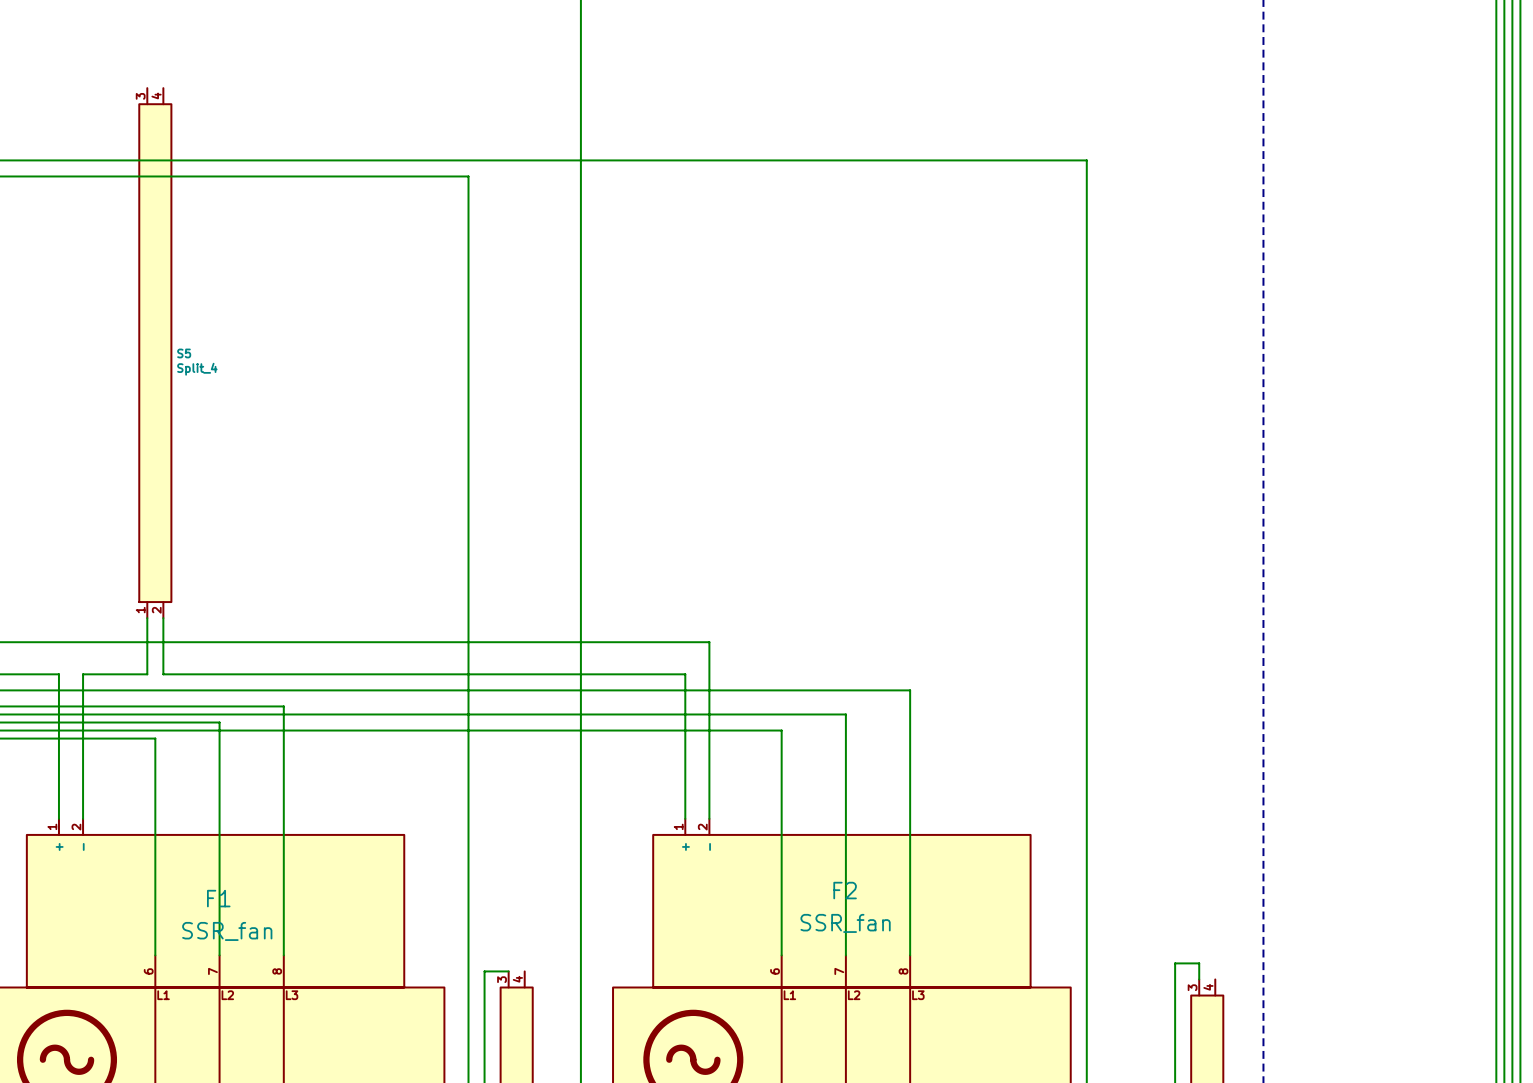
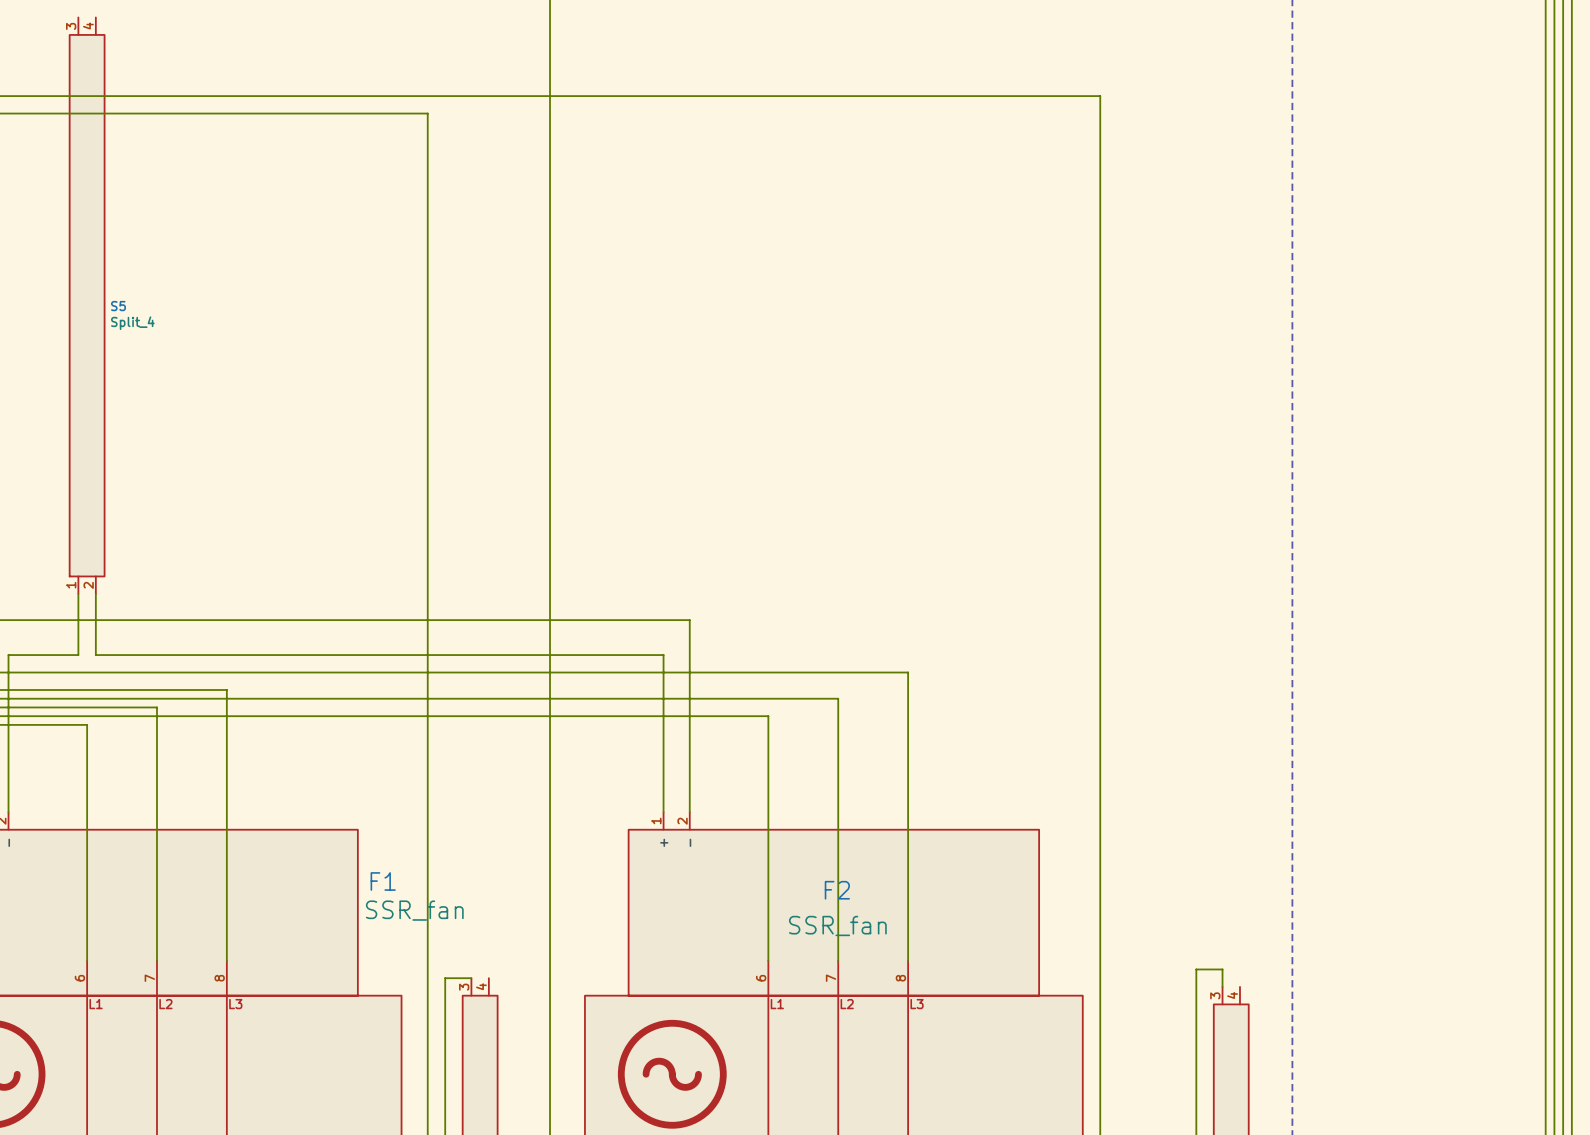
F1 name position: F1 (218, 898) -> F1 (383, 881)
F1 value position: SSR_fan (227, 931) -> SSR_fan (414, 910)

